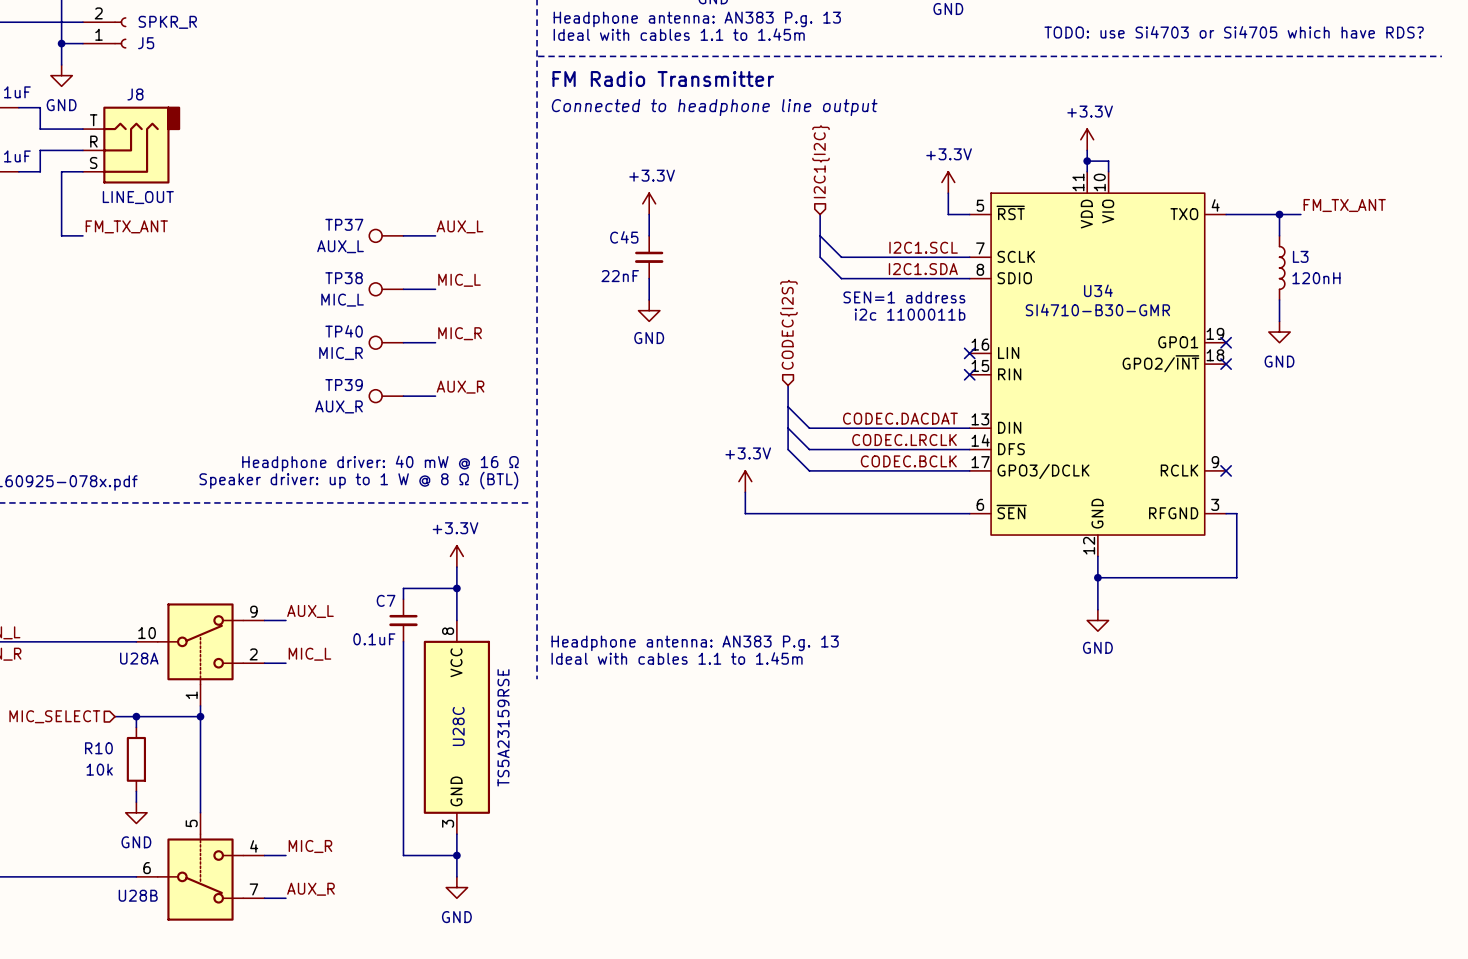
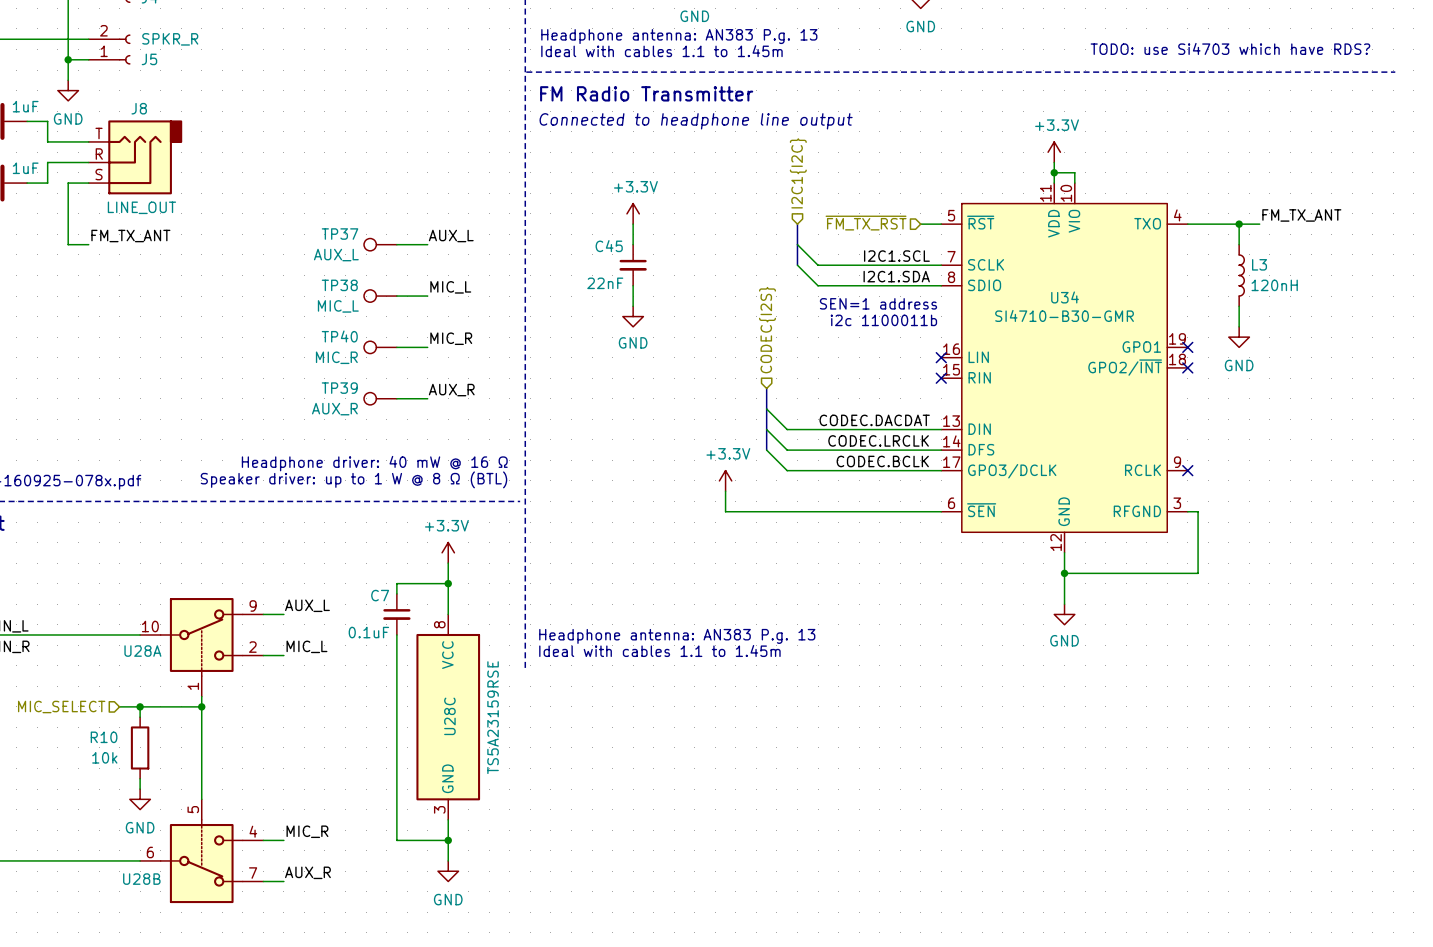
text: TODO: use Si4703 or Si4705 which have RDS? (1234, 32) -> TODO: use Si4703 which have RDS? (1230, 48)
power symbol: +3.3V (948, 182) -> none
wire: (948, 193) (948, 214) -> none
hierarchical label: none -> ~{FM_TX_RST} (866, 223)

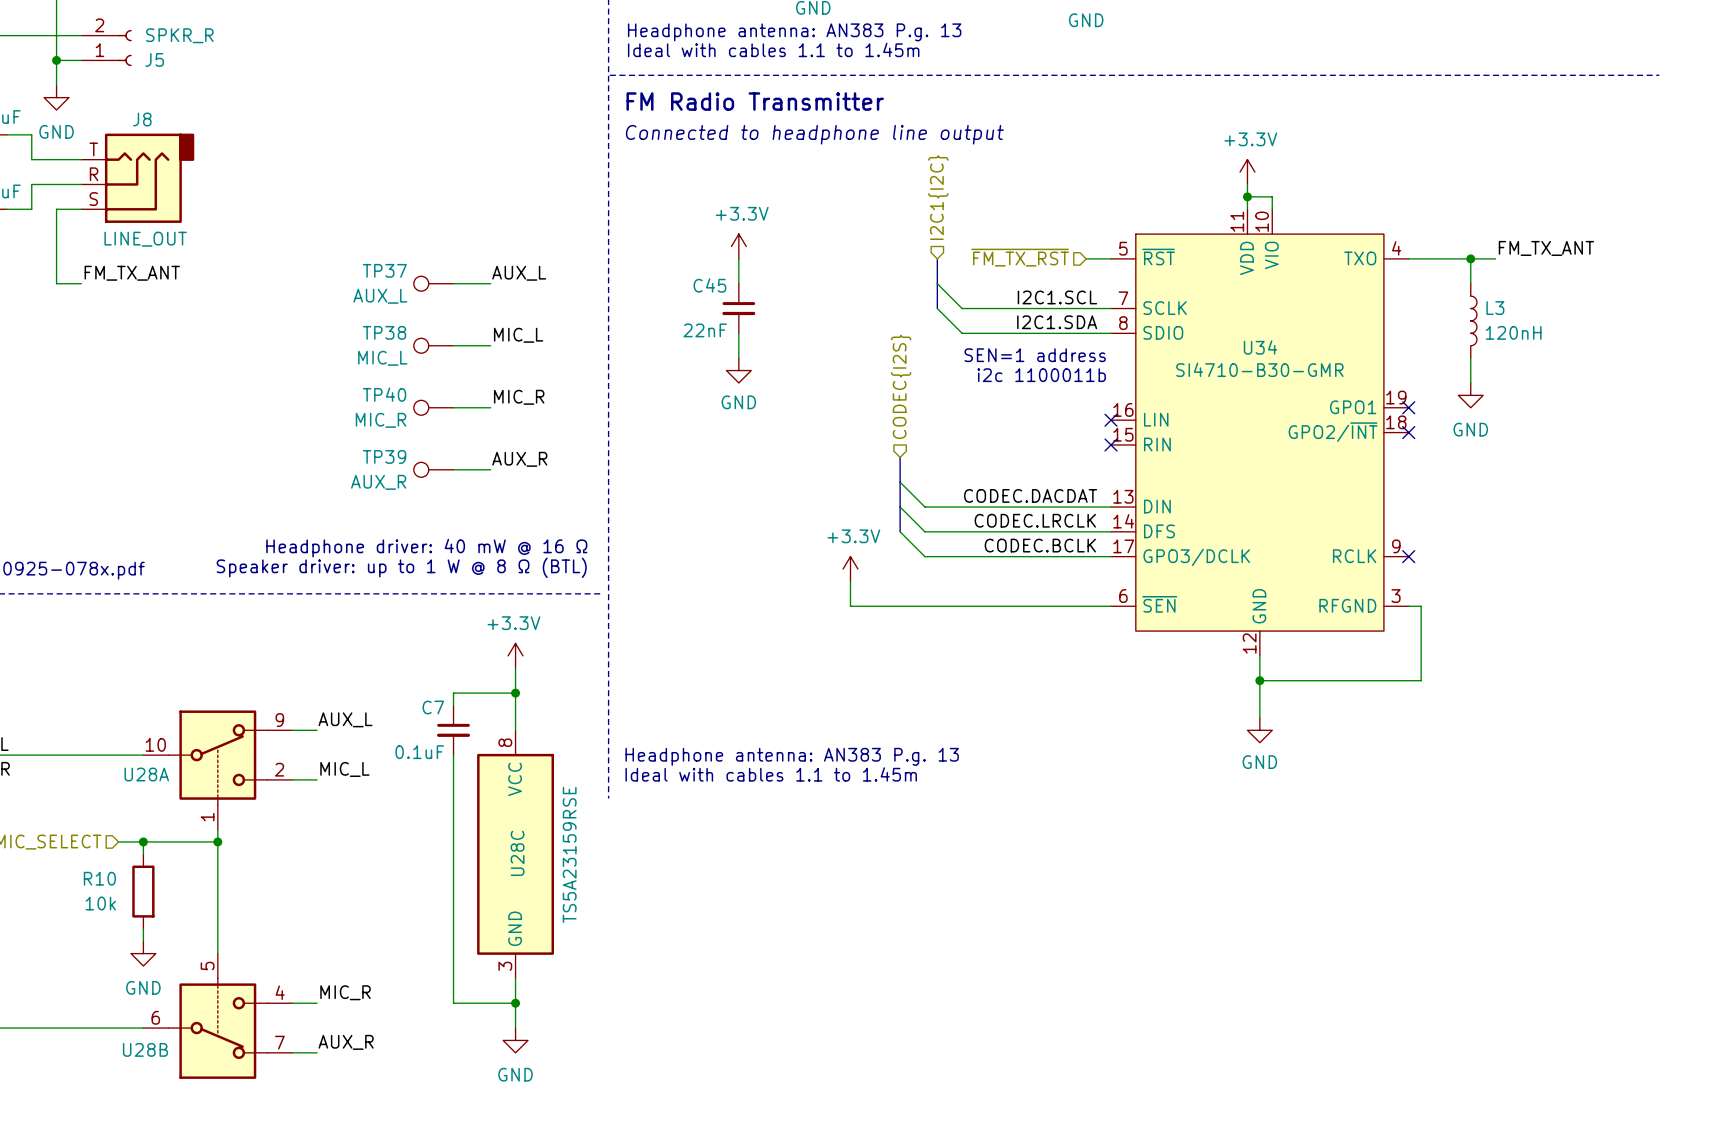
text: TODO: use Si4703 which have RDS? (1230, 48) -> none

